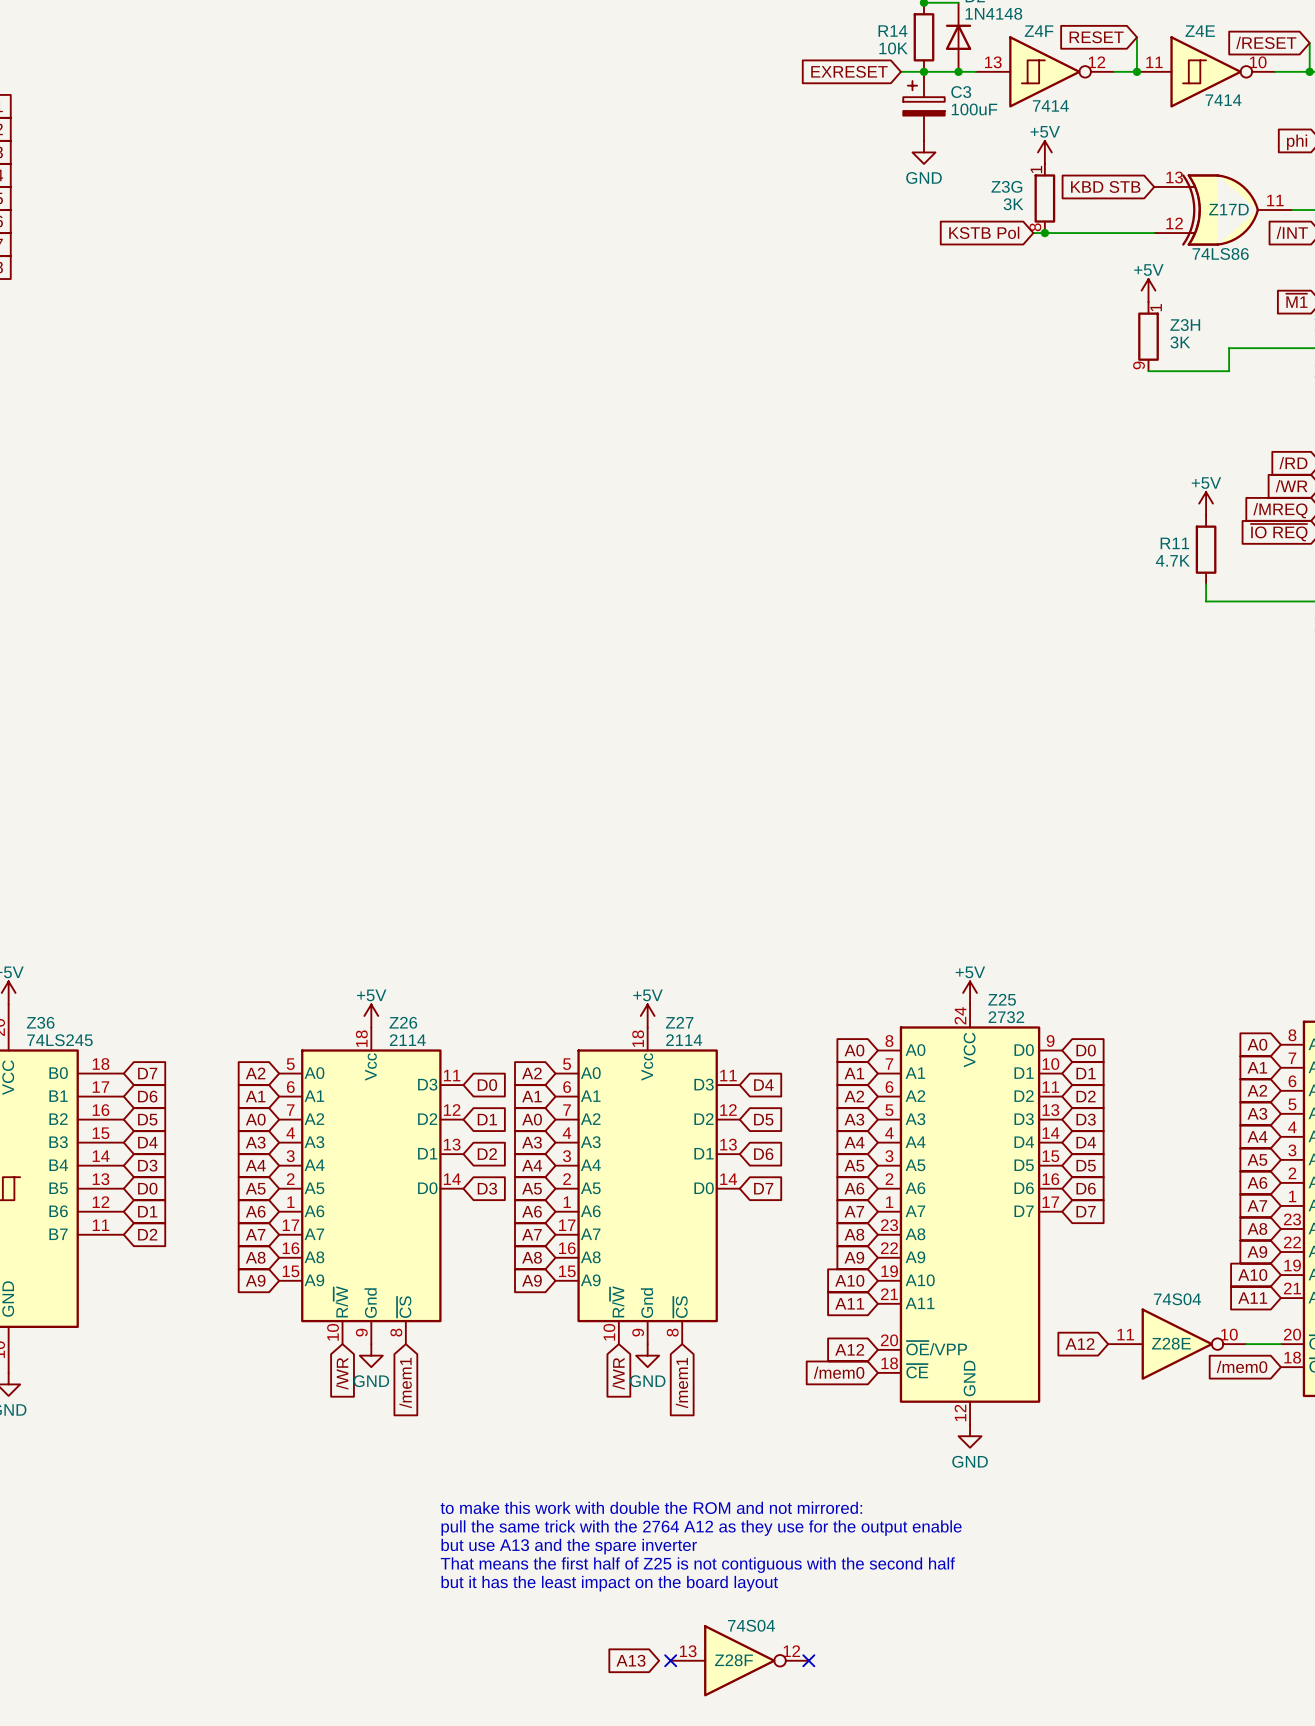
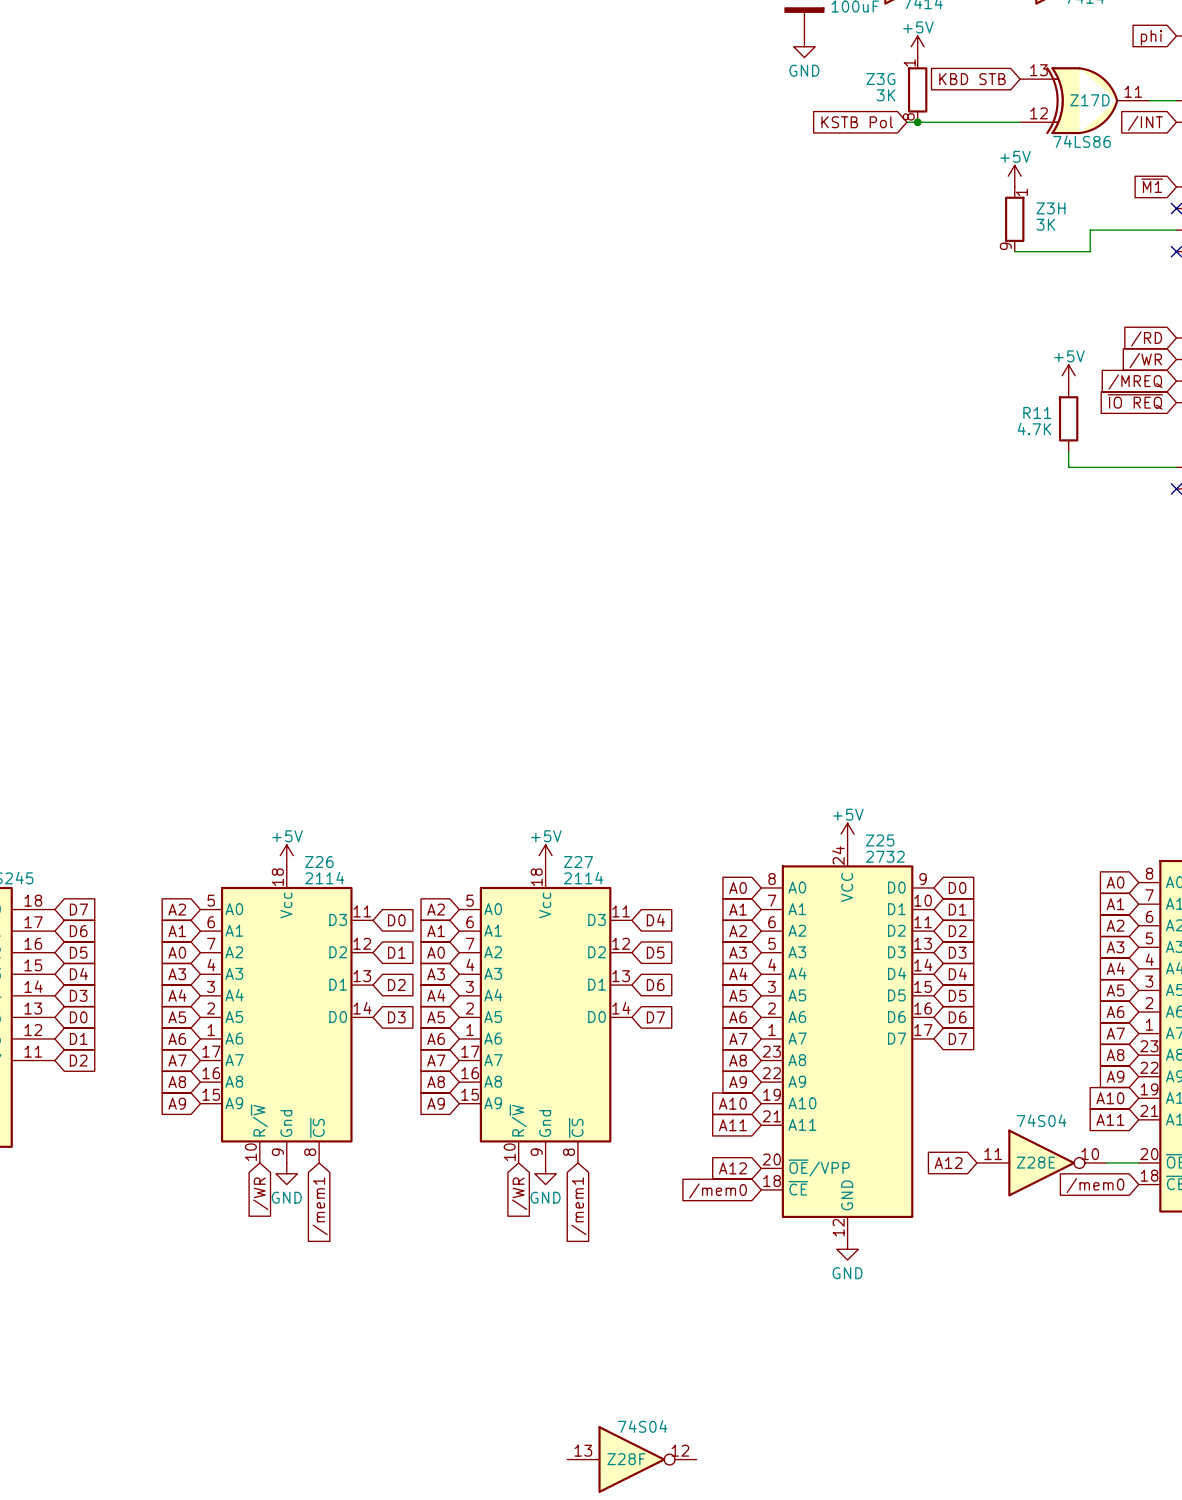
text: to make this work with double the ROM and not mirrored: (651, 1507) -> none
text: pull the same trick with the 2764 A12 as they use for the output enable (701, 1528) -> none
text: but use A13 and the spare inverter (569, 1546) -> none
text: That means the first half of Z25 is not contiguous with the second half (697, 1565) -> none
text: but it has the least impact on the board layout (609, 1583) -> none
global label: A13 (630, 1660) -> none
no-connect mark: (670, 1660) -> none
no-connect mark: (808, 1660) -> none

